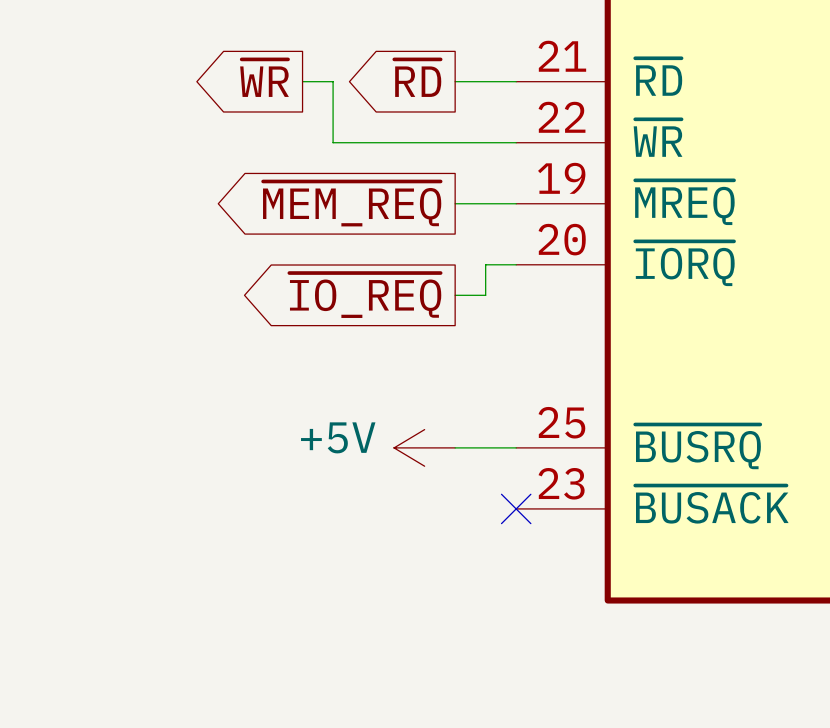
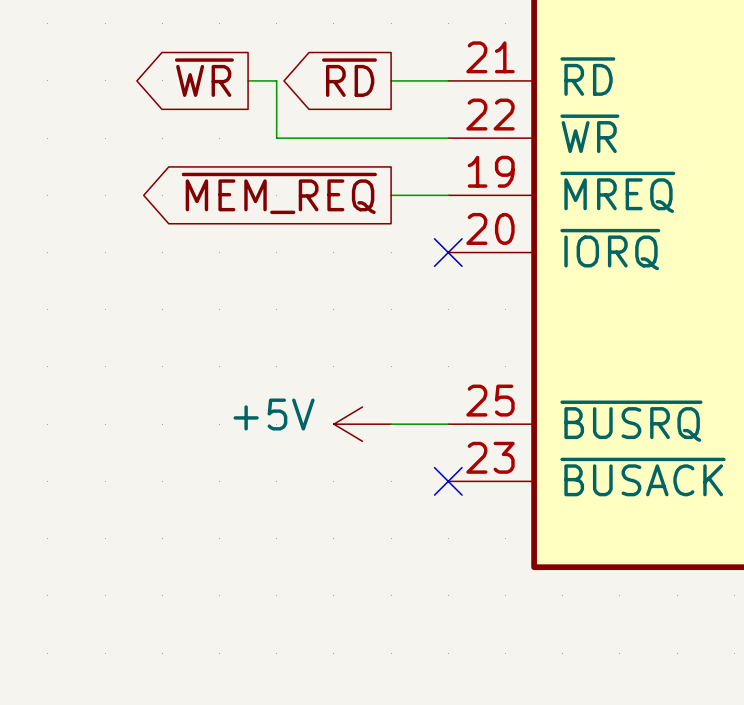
wire: (516, 264) (485, 264) (485, 295) (455, 295) -> none
no-connect mark: none -> (448, 252)
global label: ~{IO_REQ} (365, 295) -> none

